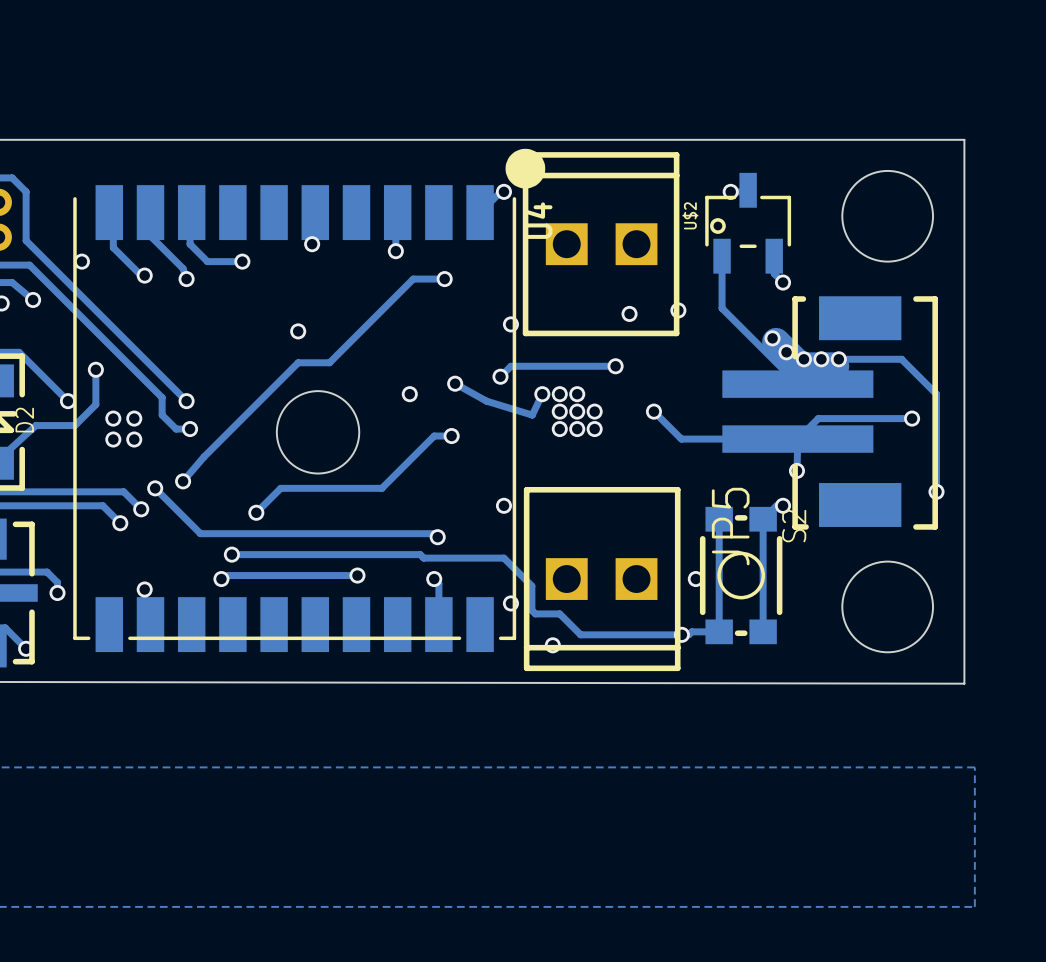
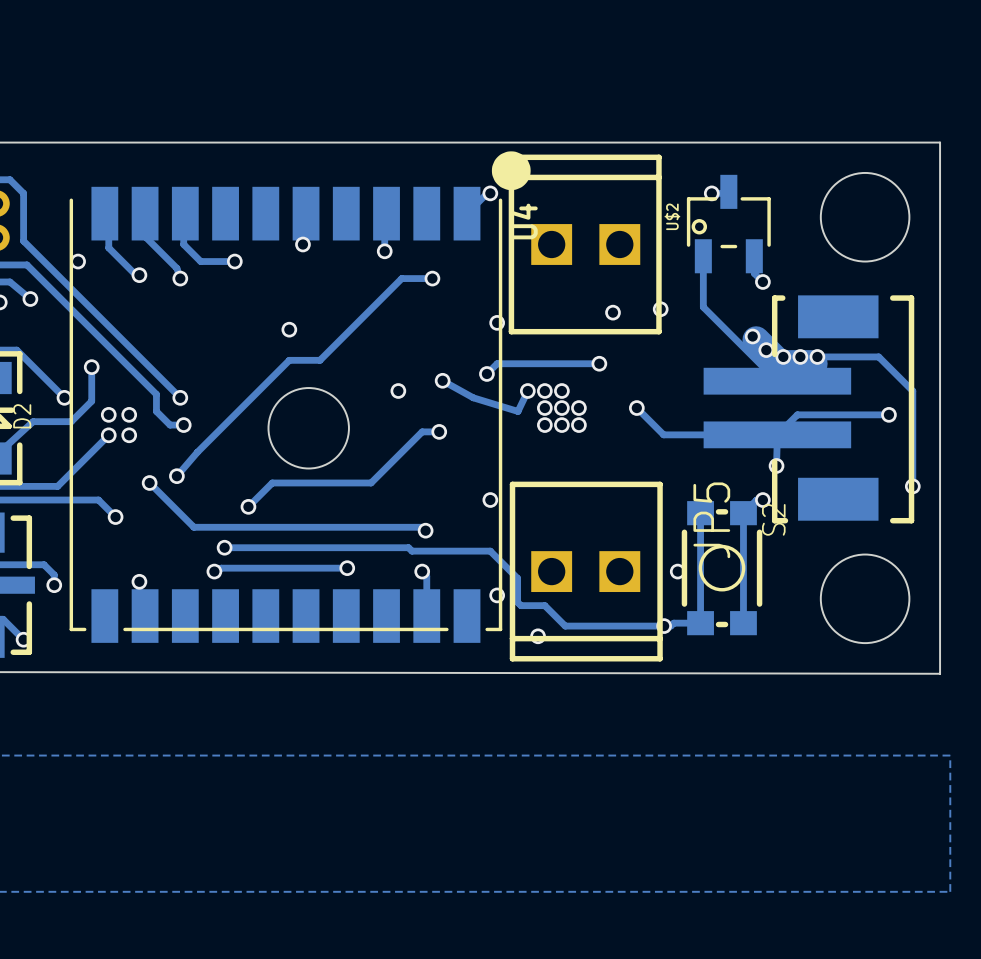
track: (61, 491) (123, 491) (141, 509) -> (57, 486) (108, 435)
via: (141, 509) -> none

